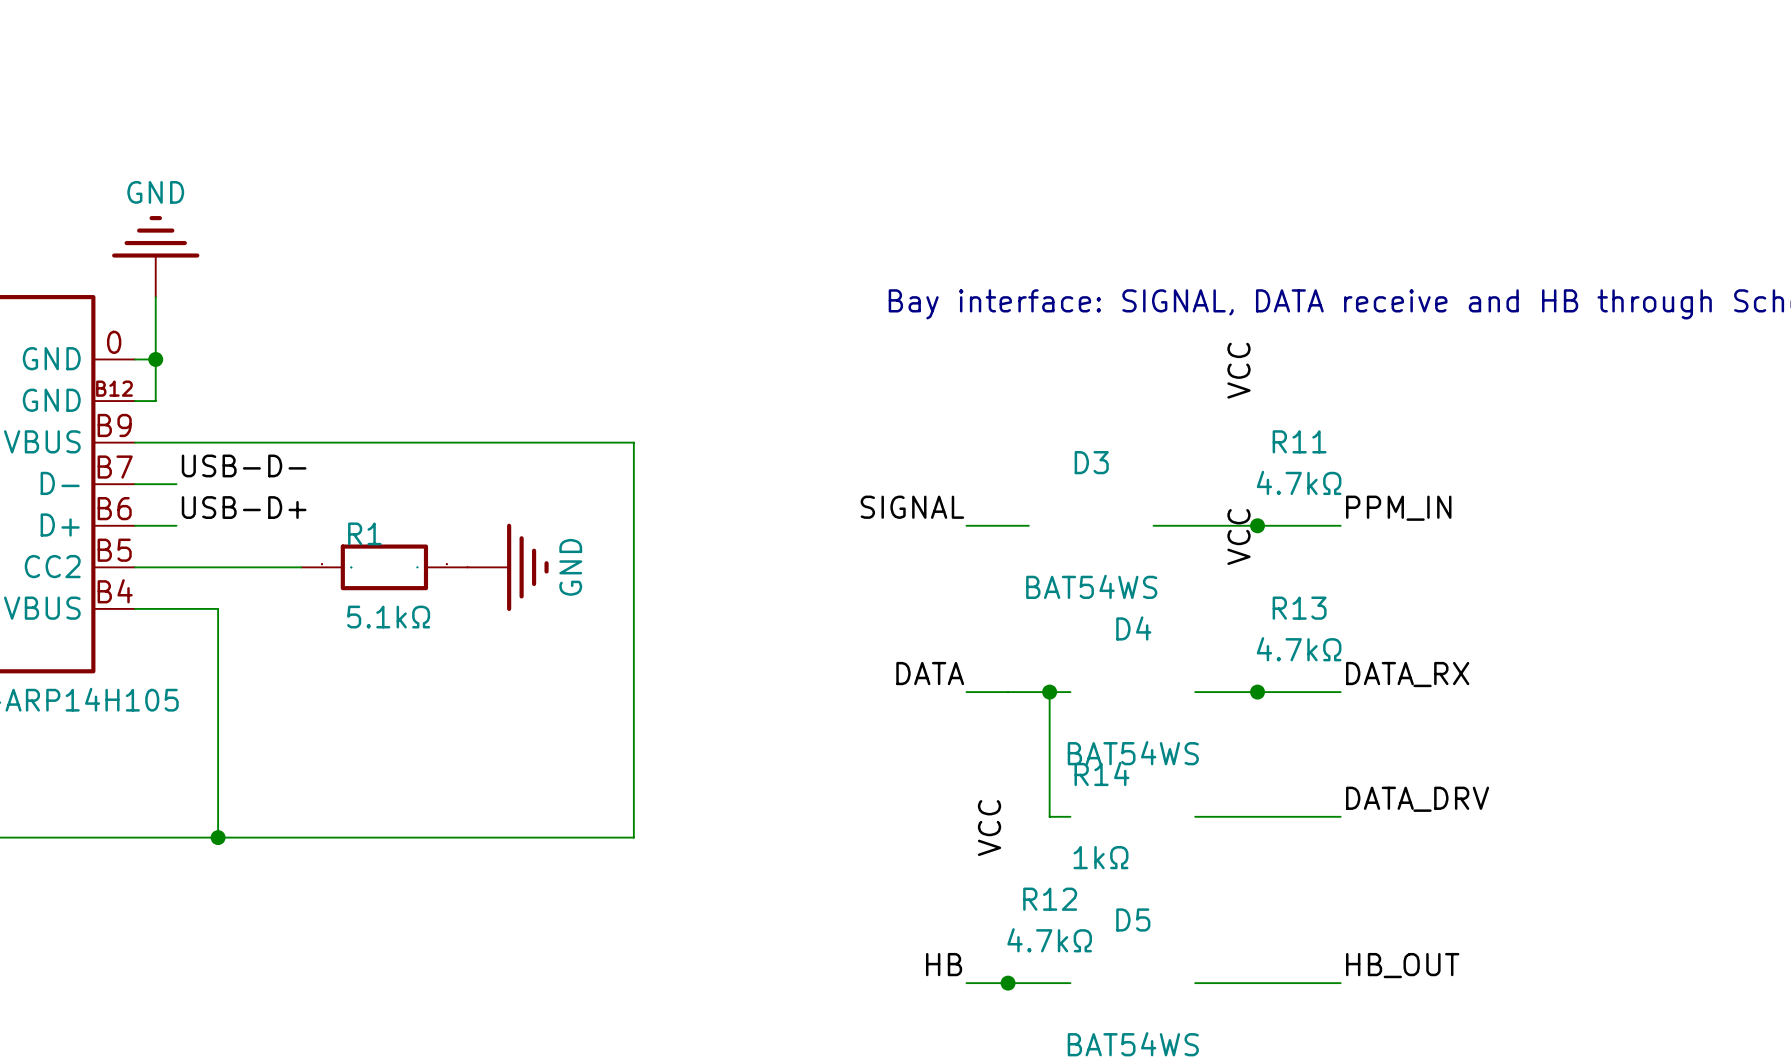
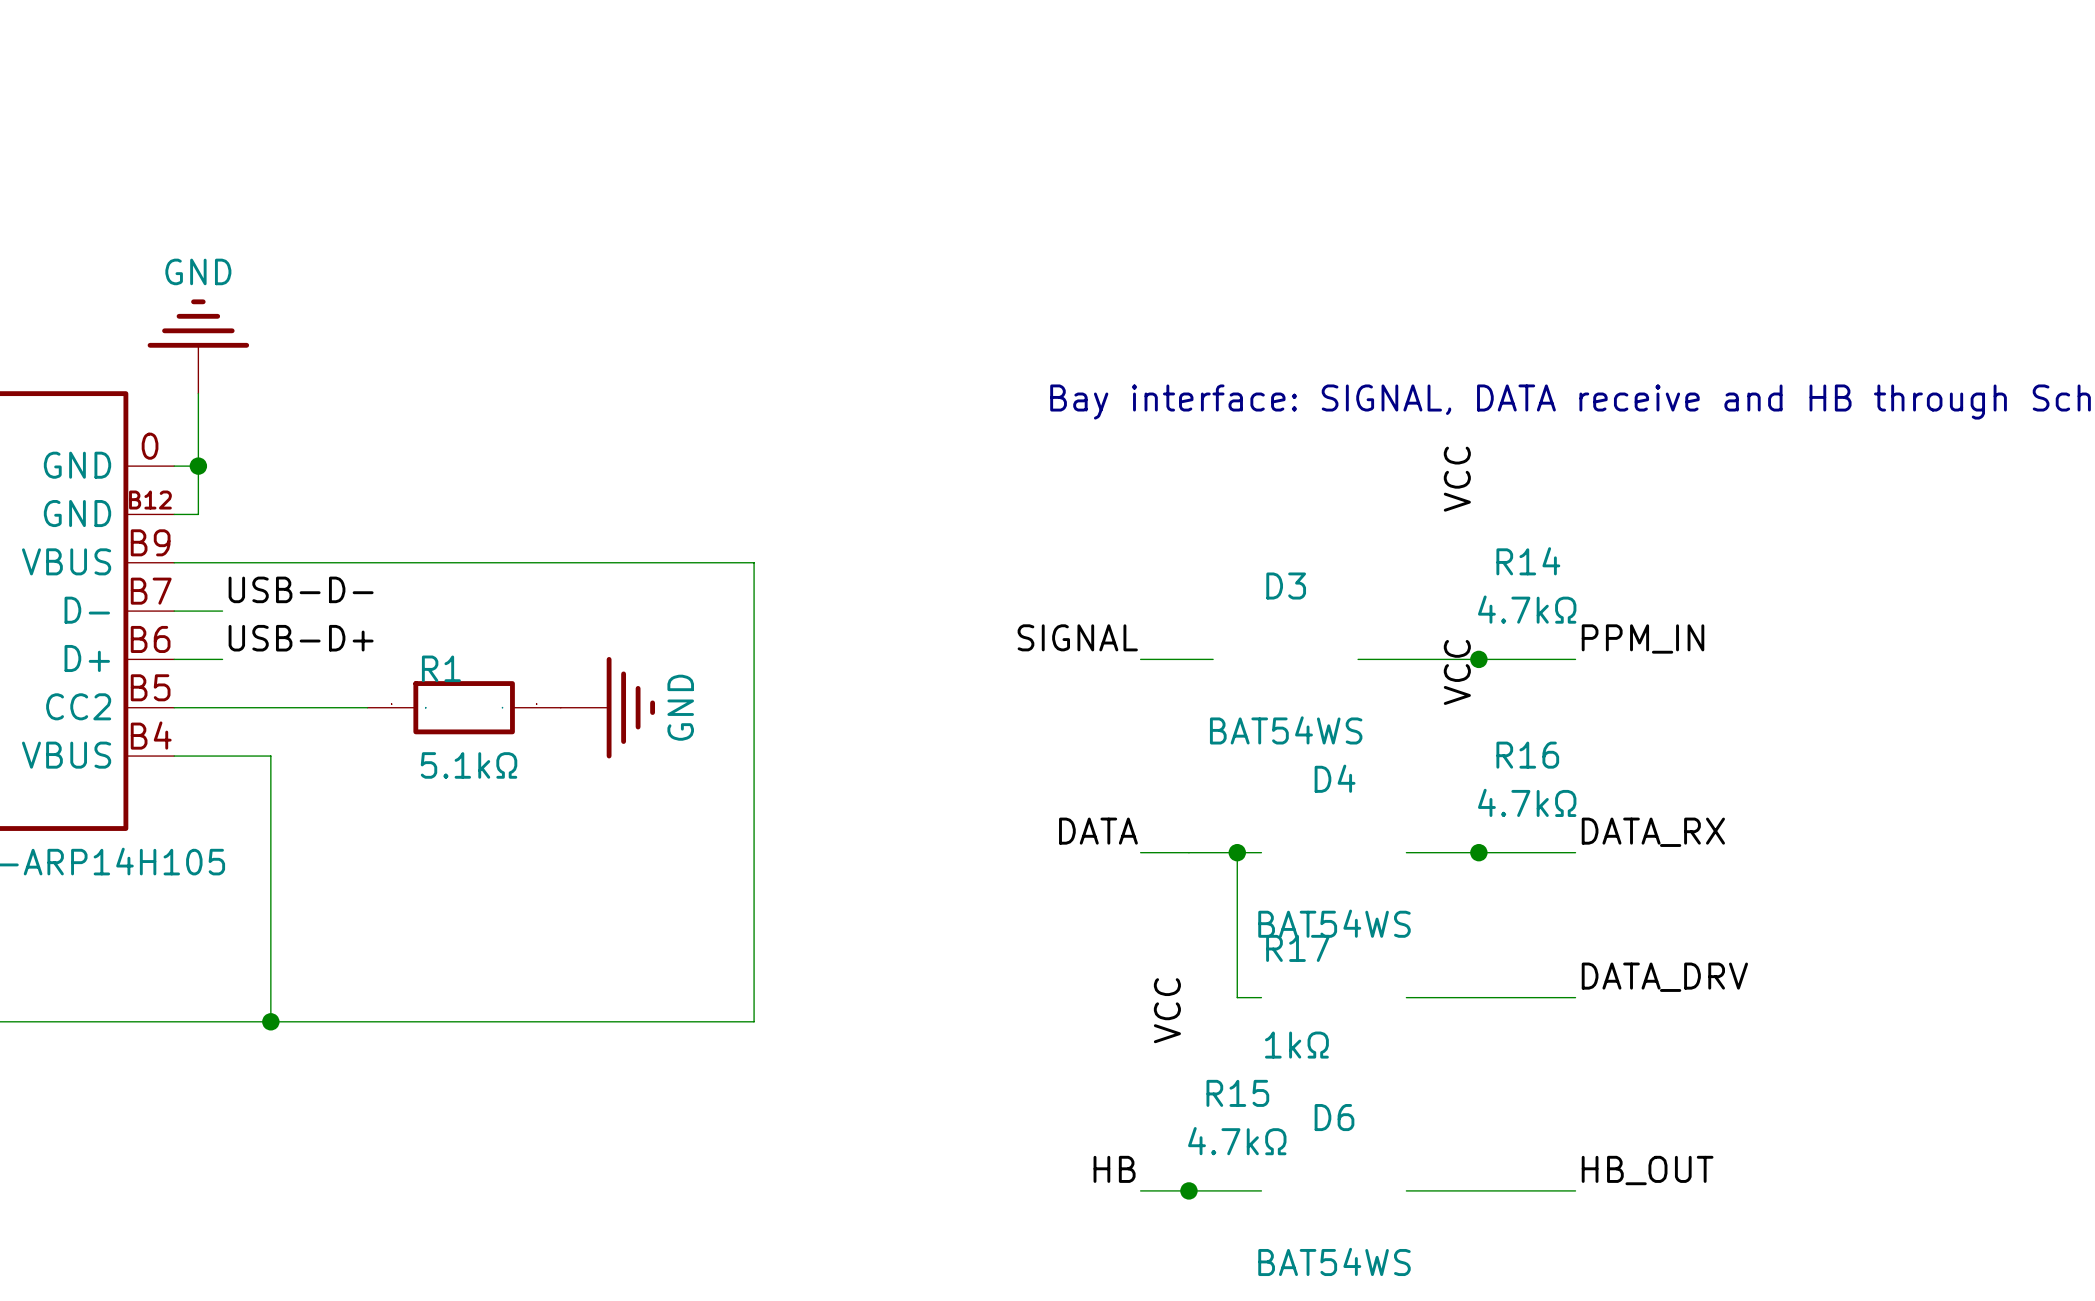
R11 name: R11 (1299, 441) -> R14 (1528, 561)
R13 name: R13 (1299, 608) -> R16 (1527, 755)
R14 name: R14 (1101, 773) -> R17 (1298, 948)
R12 name: R12 (1050, 899) -> R15 (1237, 1093)
D5 name: D5 (1133, 919) -> D6 (1334, 1117)

